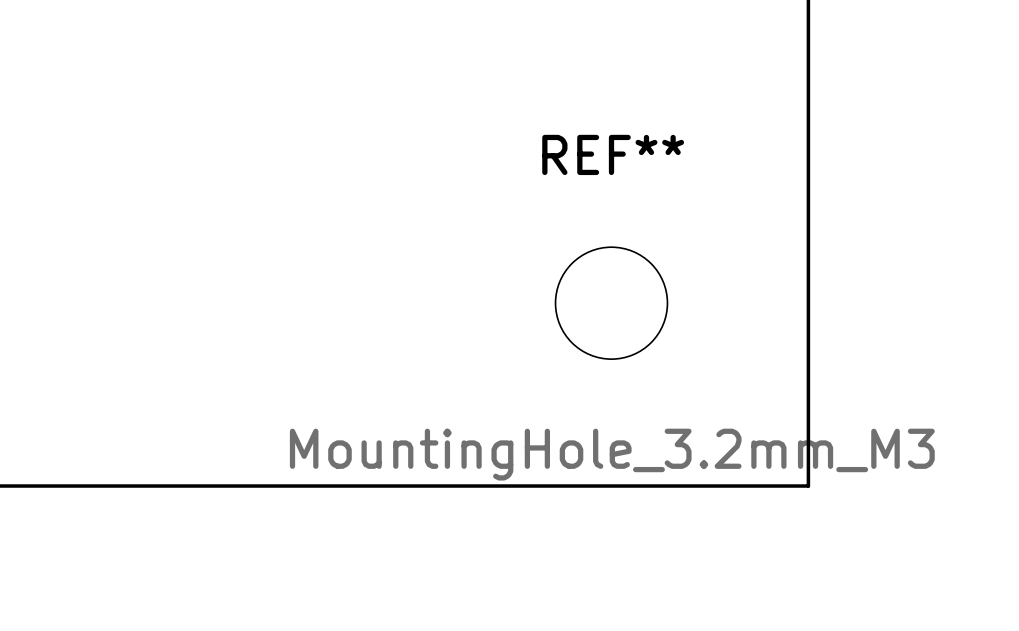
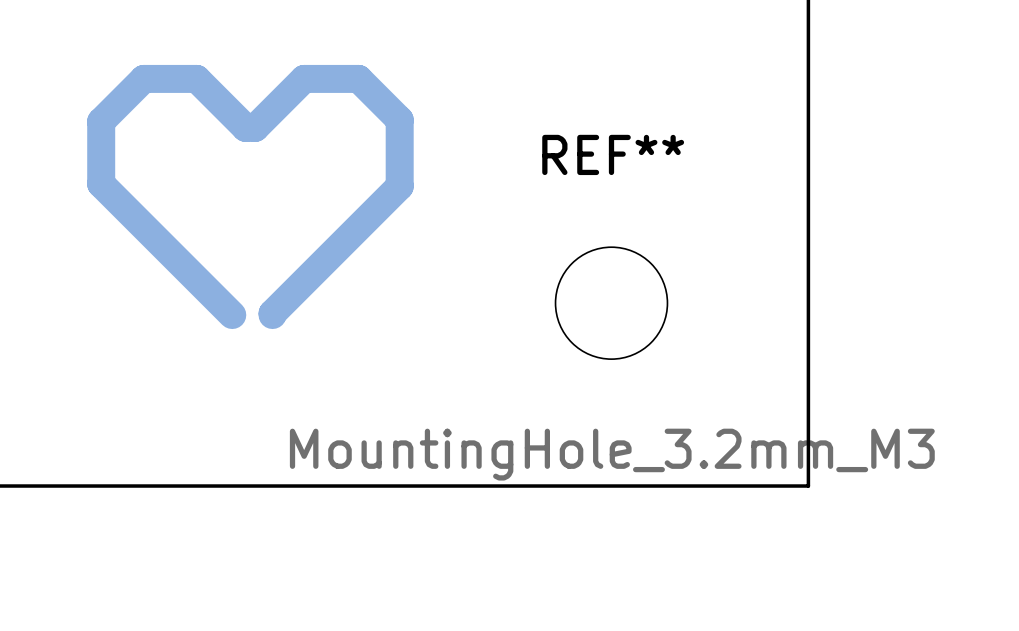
bottom track: none -> (232, 315) (101, 183) (101, 121) (143, 78) (196, 78) (245, 127) (255, 127) (304, 78) (358, 78) (399, 119) (399, 186) (272, 315)

